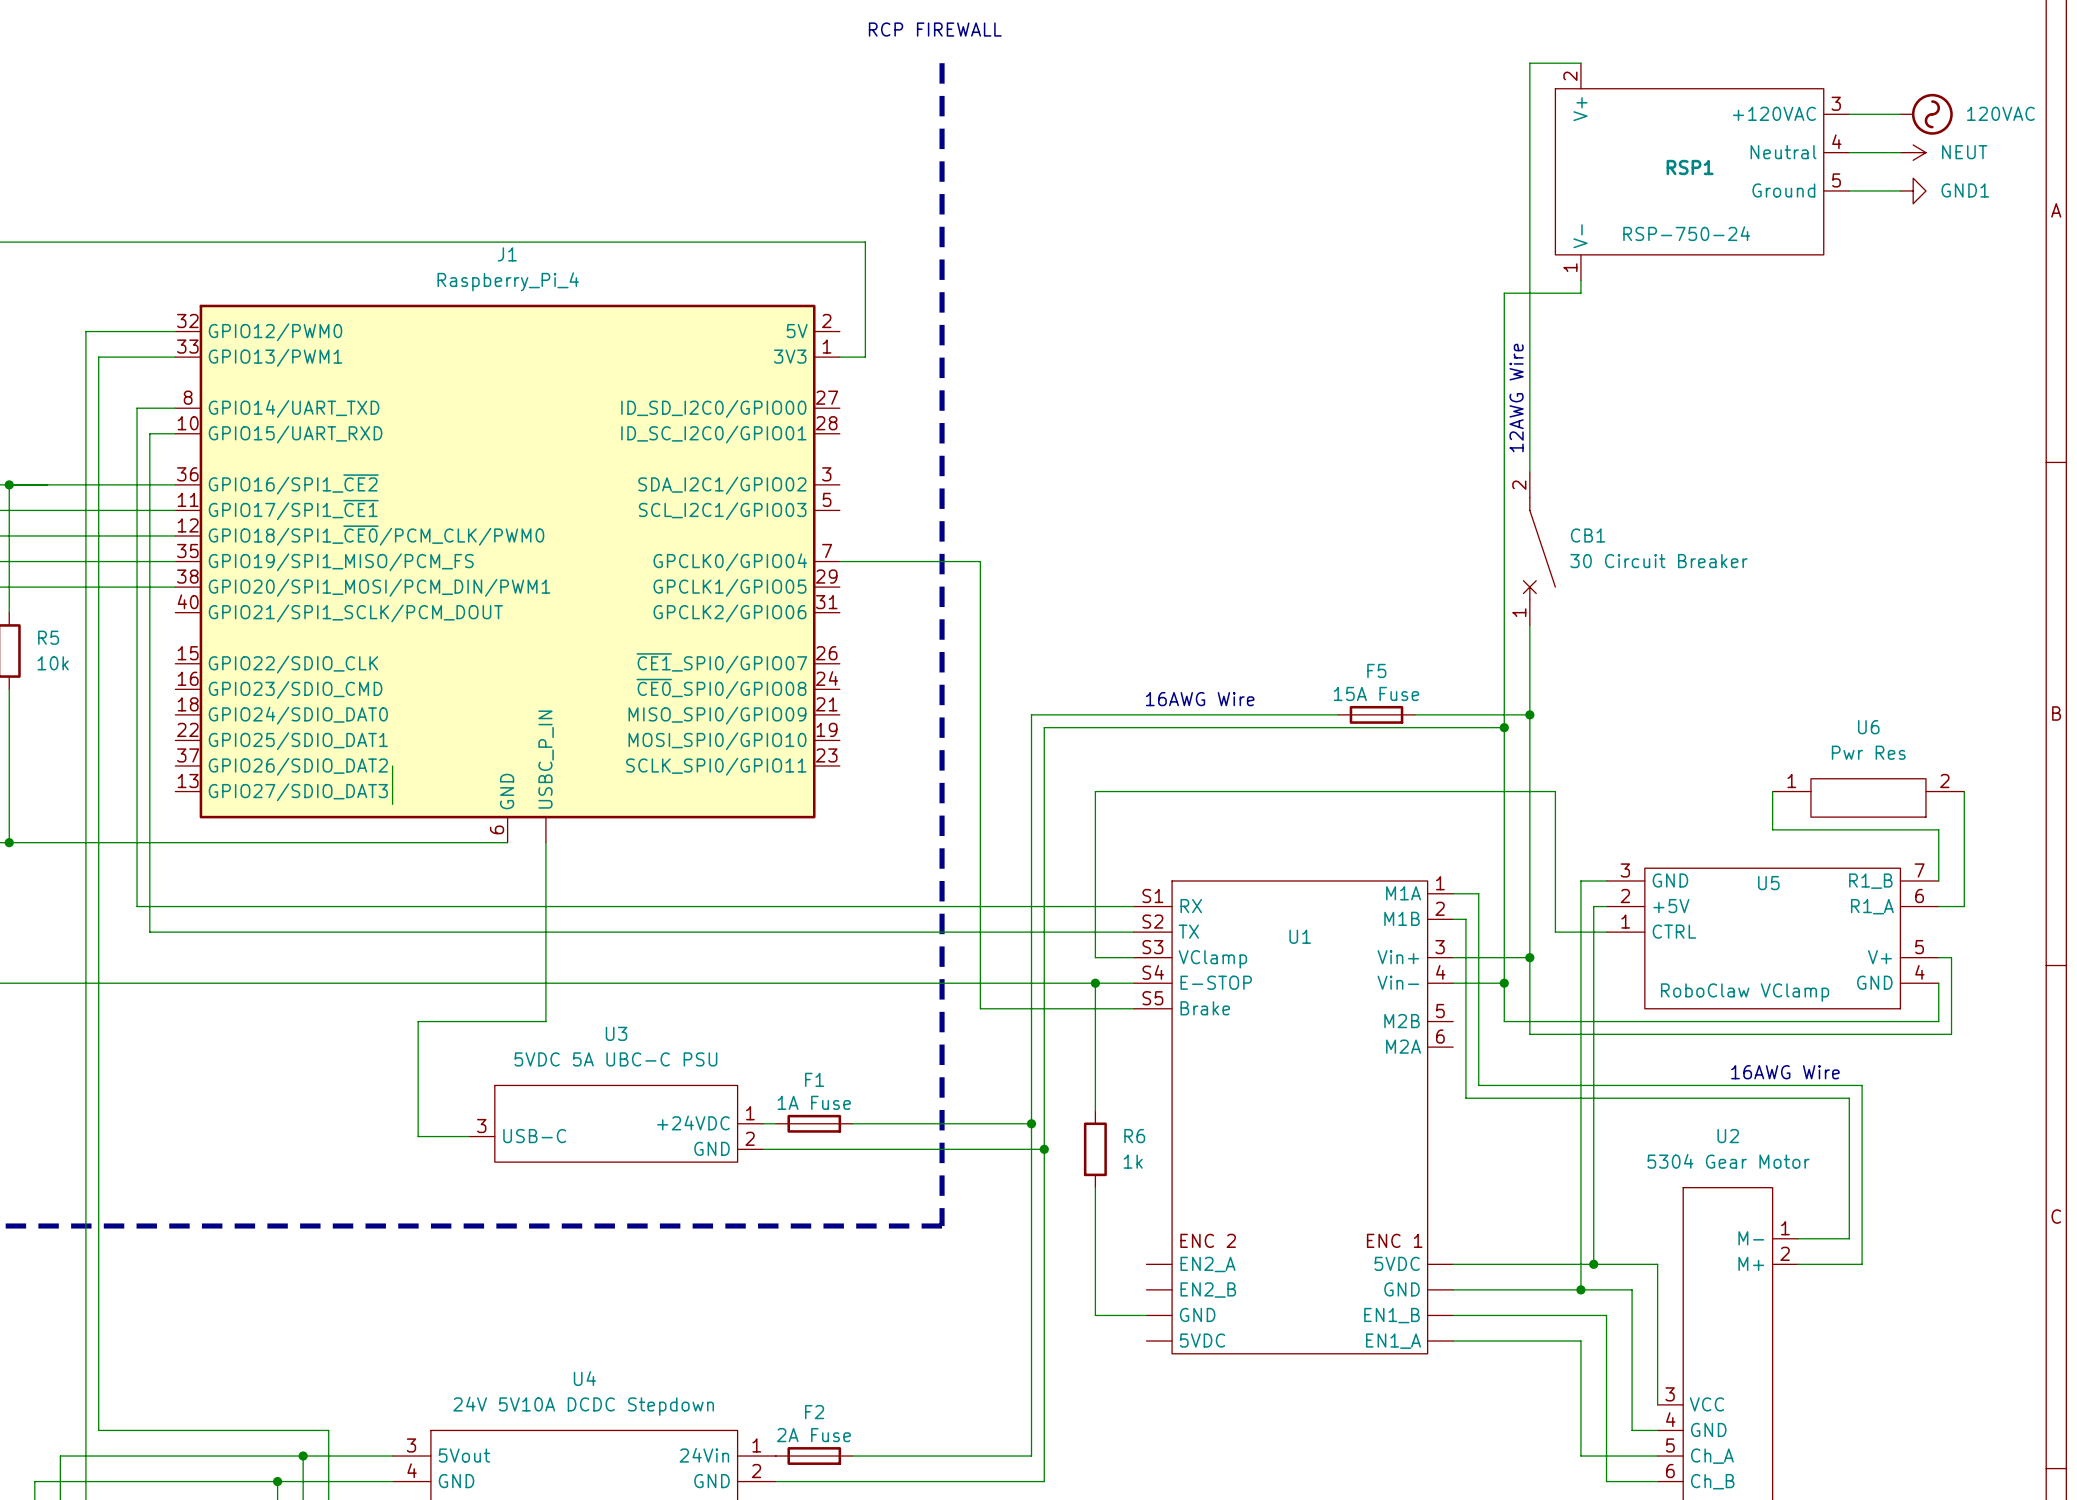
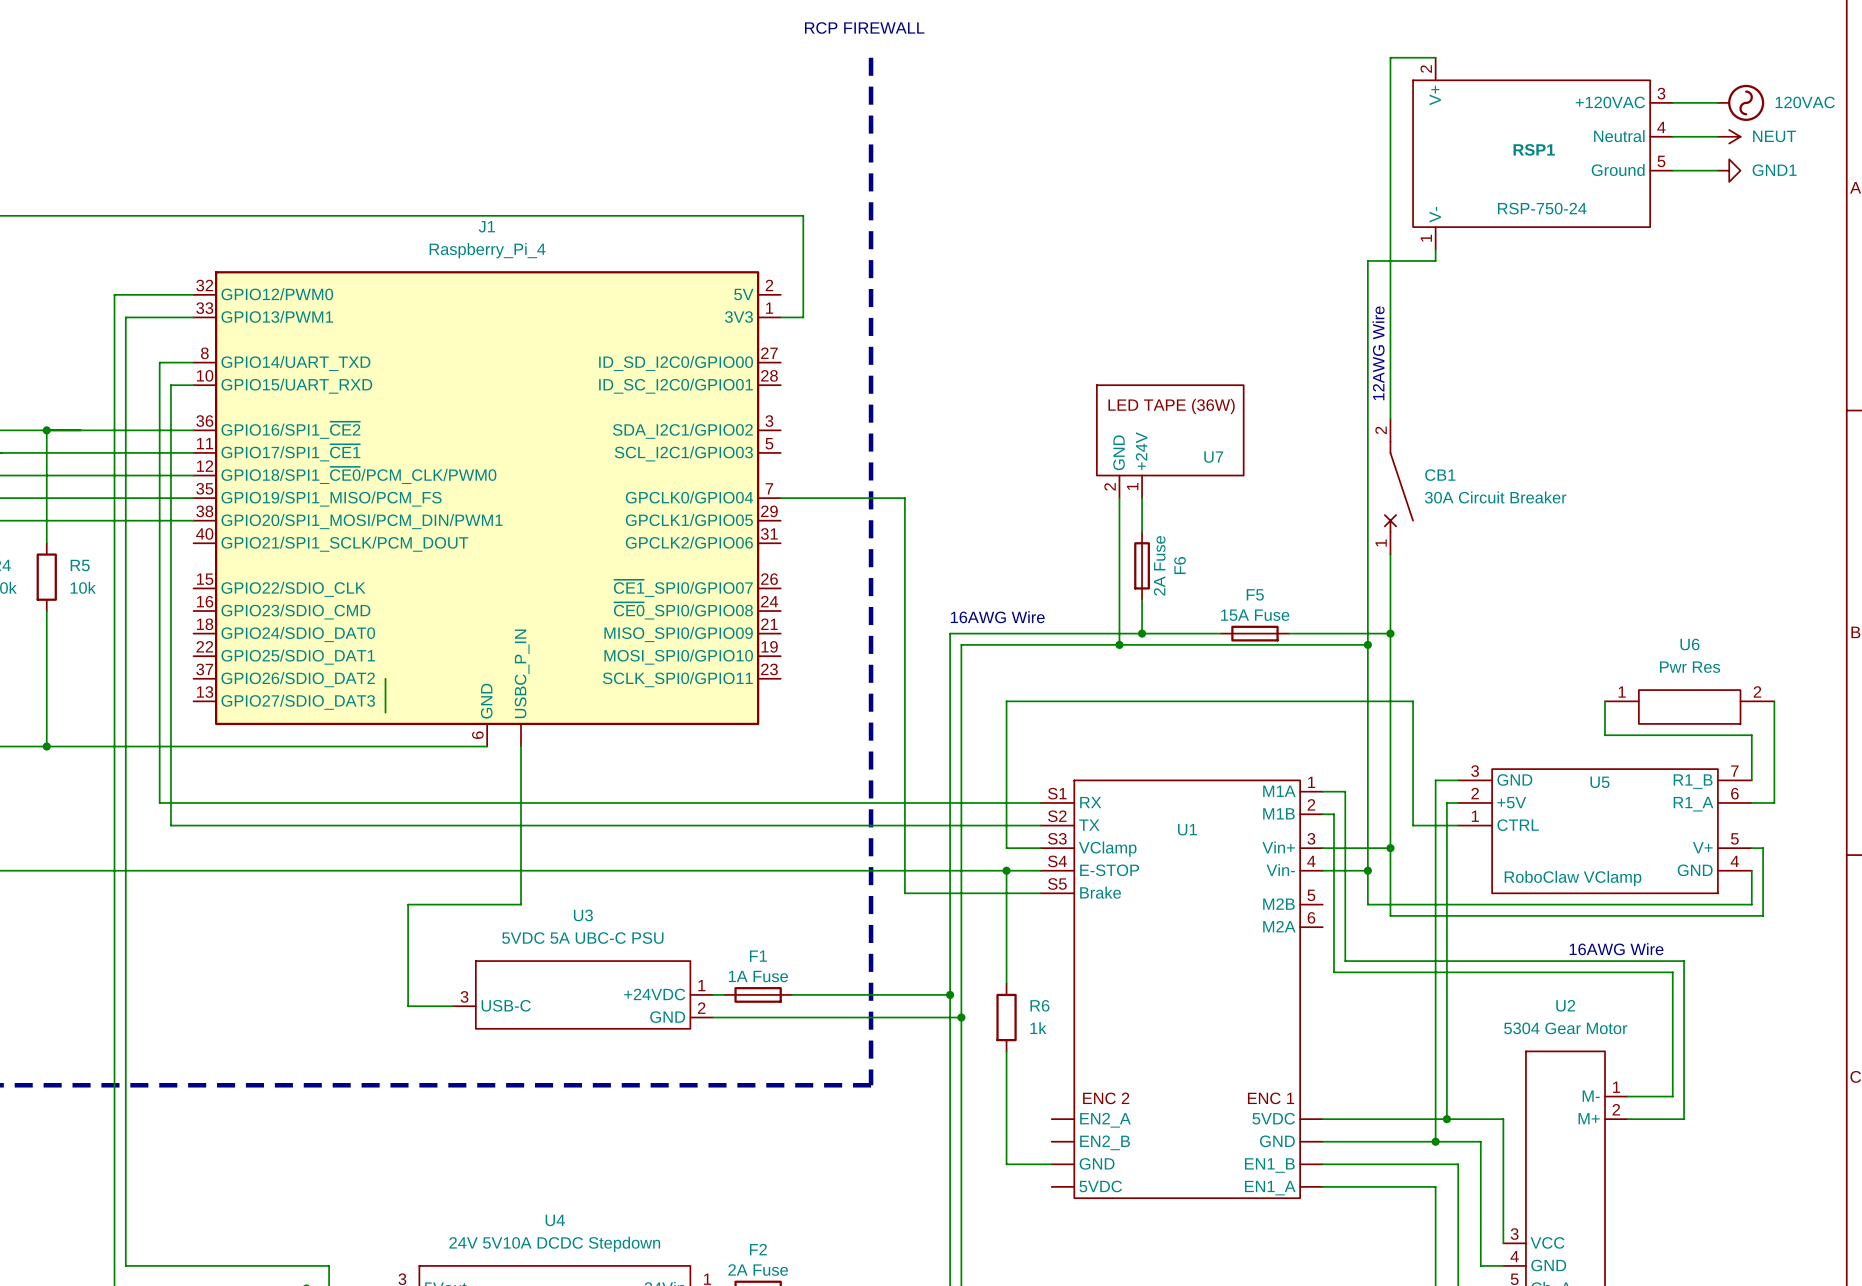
U7: none -> (1170, 441)
wire: none -> (1119, 498) (1119, 644)
wire: none -> (1142, 498) (1142, 531)
CB1 value: 30 Circuit Breaker (1658, 561) -> 30A Circuit Breaker (1495, 497)
F6: none -> 2A Fuse (1142, 565)
wire: none -> (1142, 599) (1142, 633)
text position: 16AWG Wire (1200, 699) -> 16AWG Wire (997, 617)
junction: none -> (1142, 633)
junction: none -> (1119, 644)

